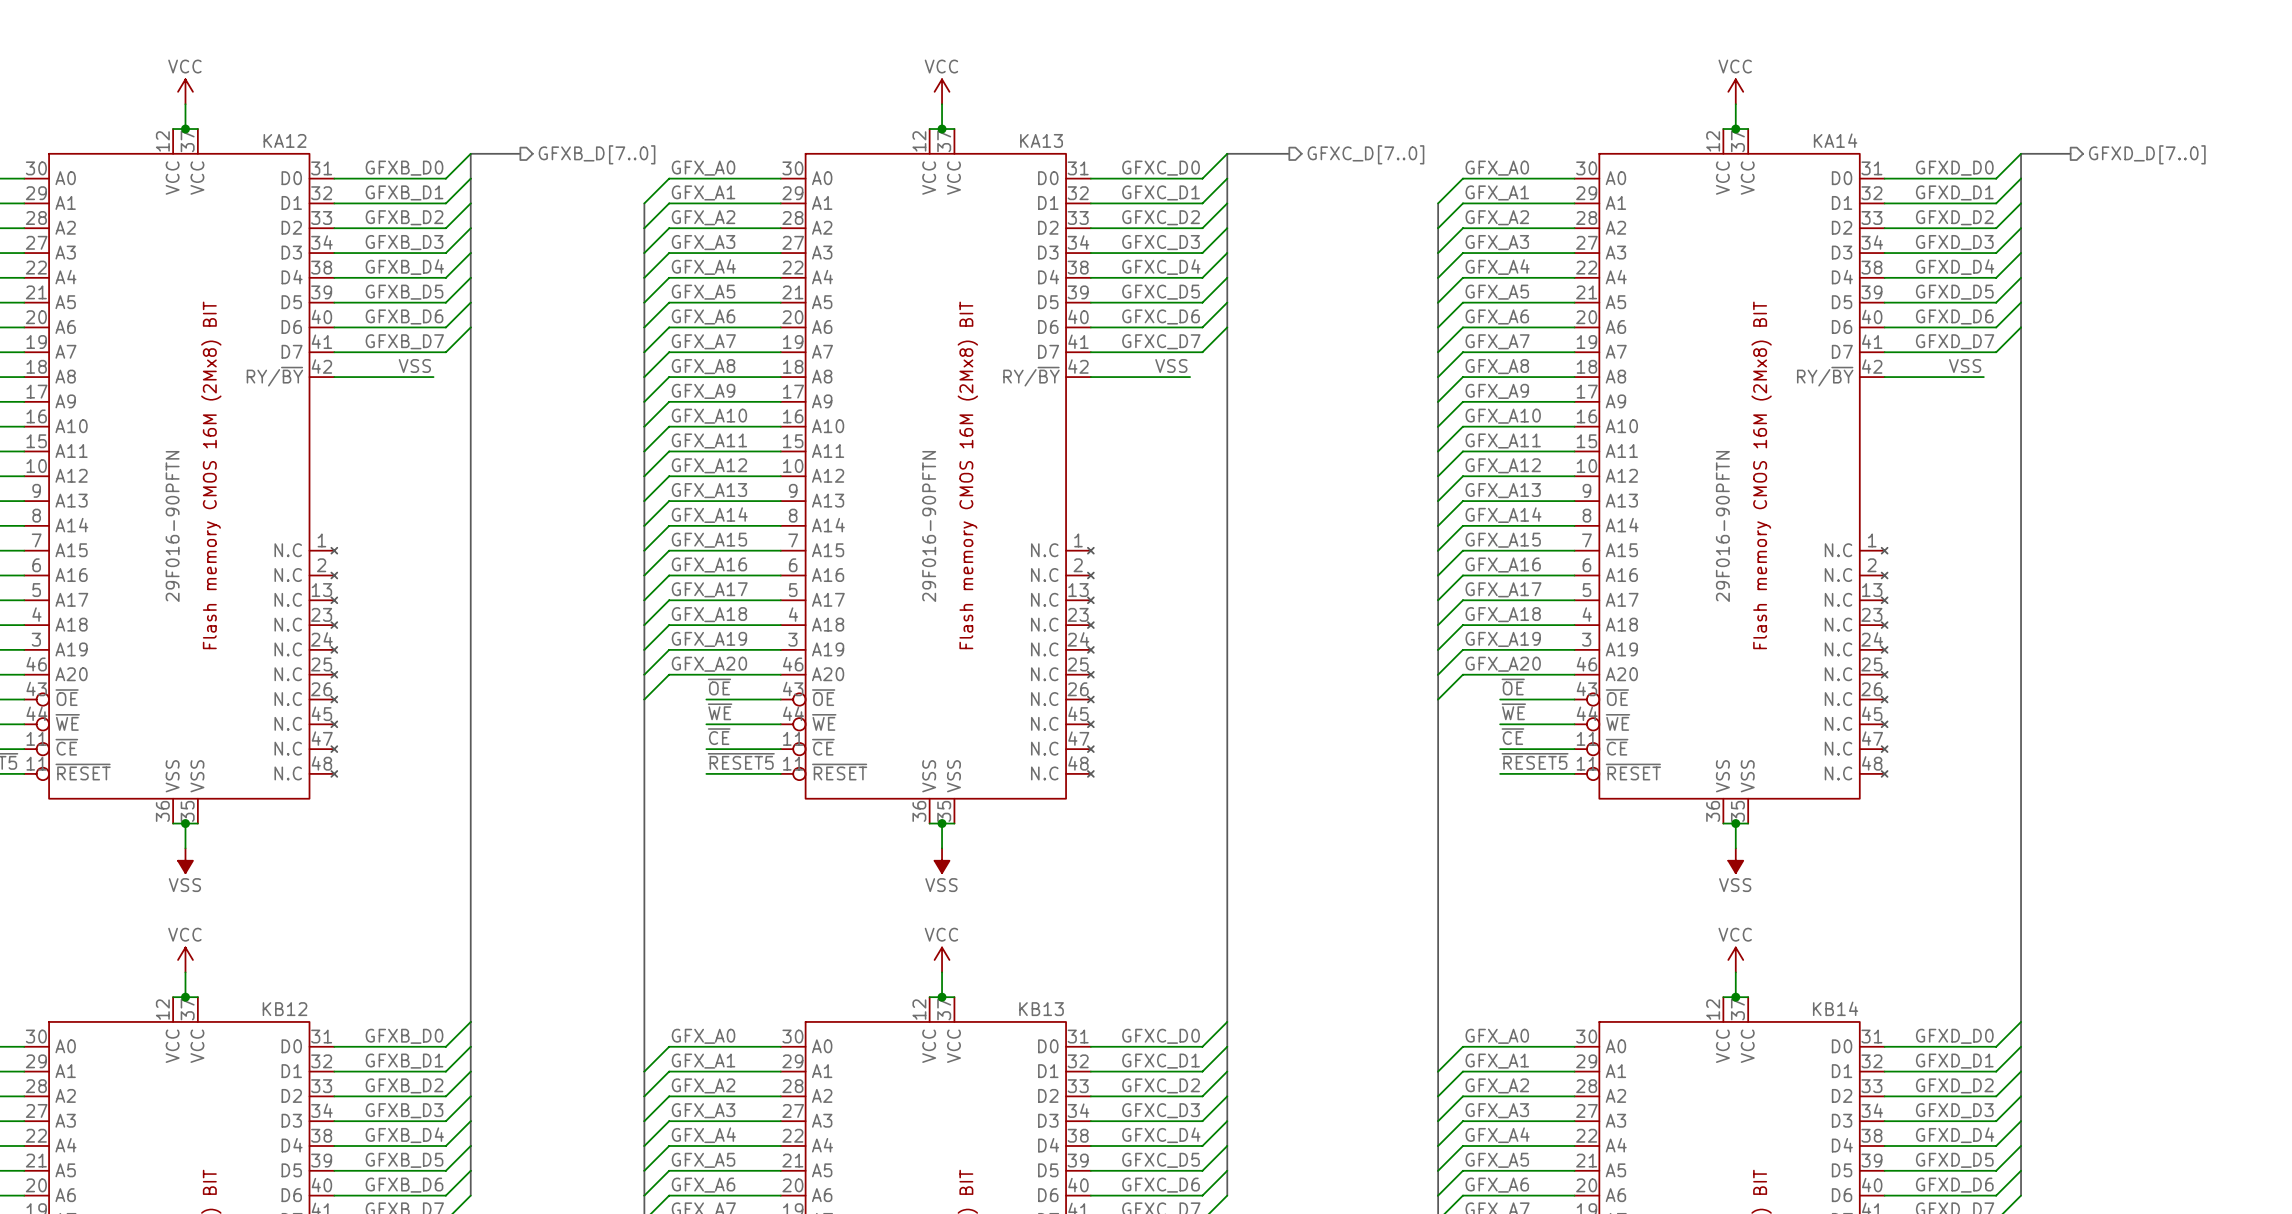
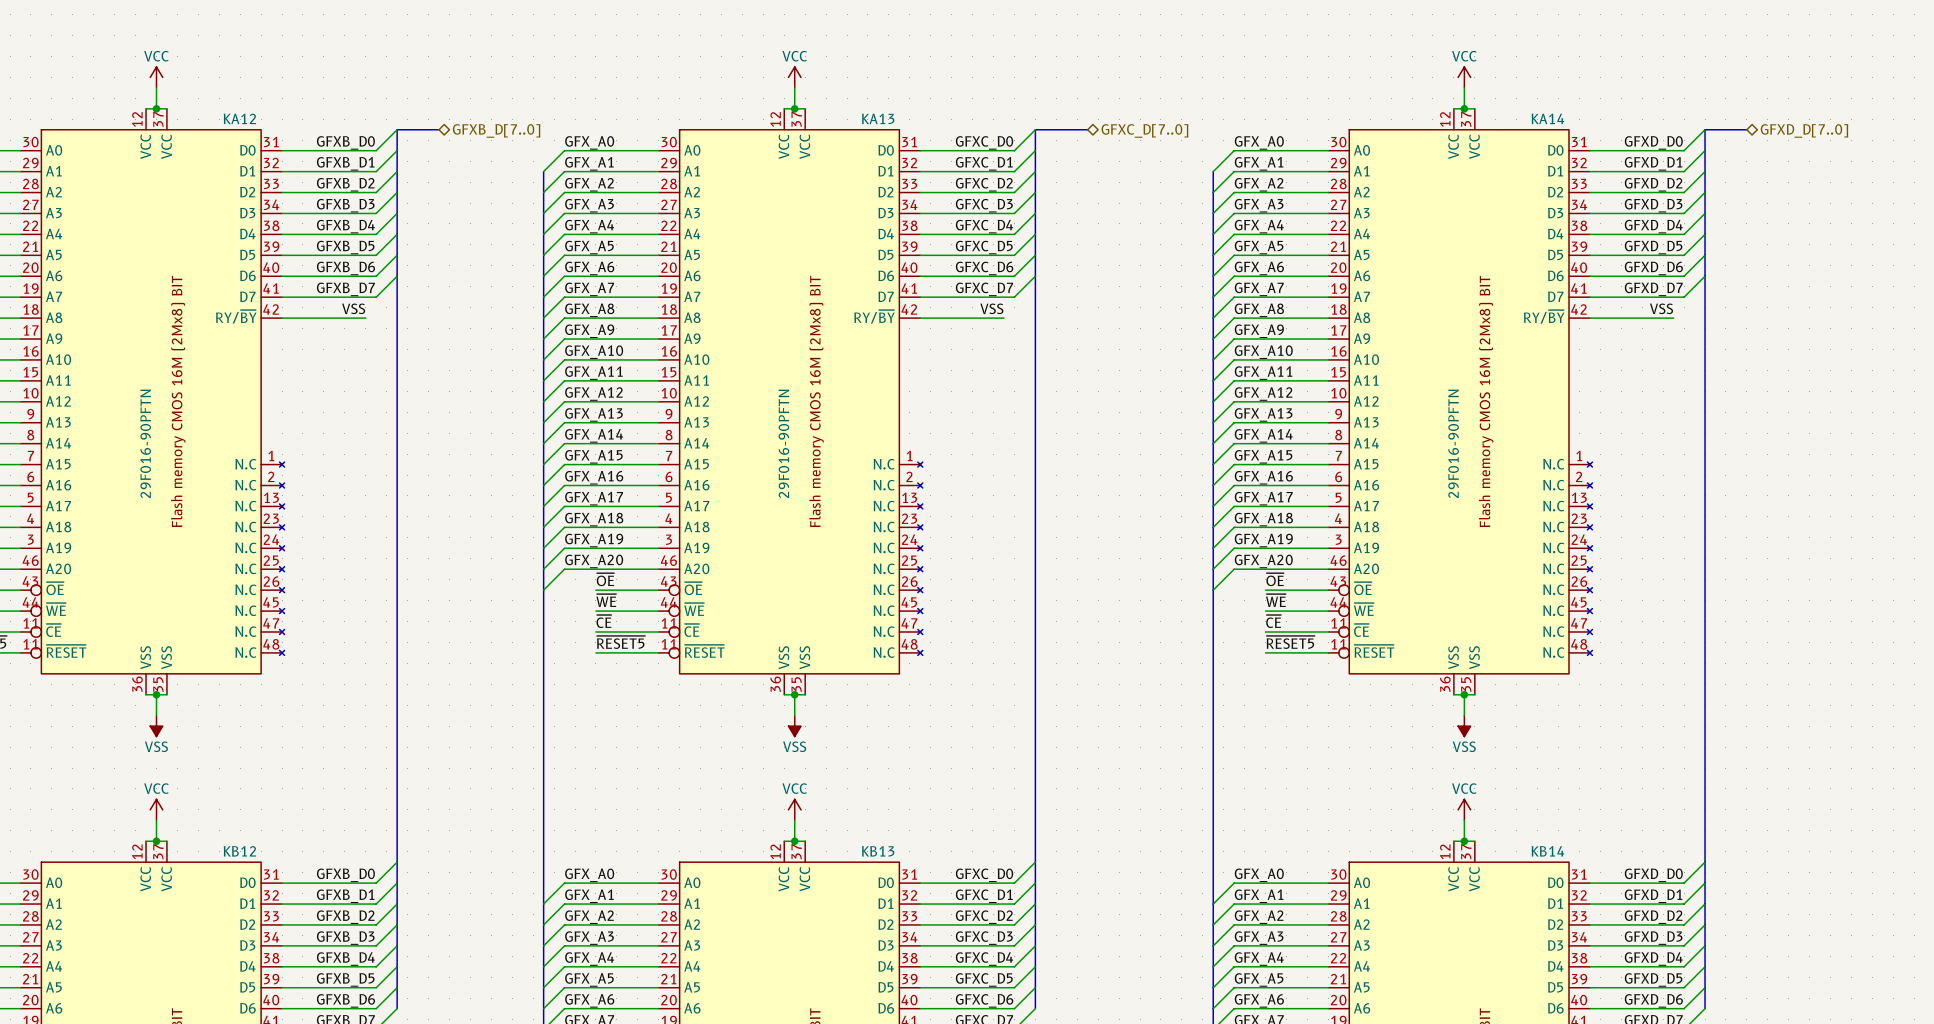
hierarchical label shape: output (597, 154) -> bidirectional (496, 130)
hierarchical label shape: output (1365, 154) -> bidirectional (1145, 130)
hierarchical label shape: output (2147, 154) -> bidirectional (1804, 130)

